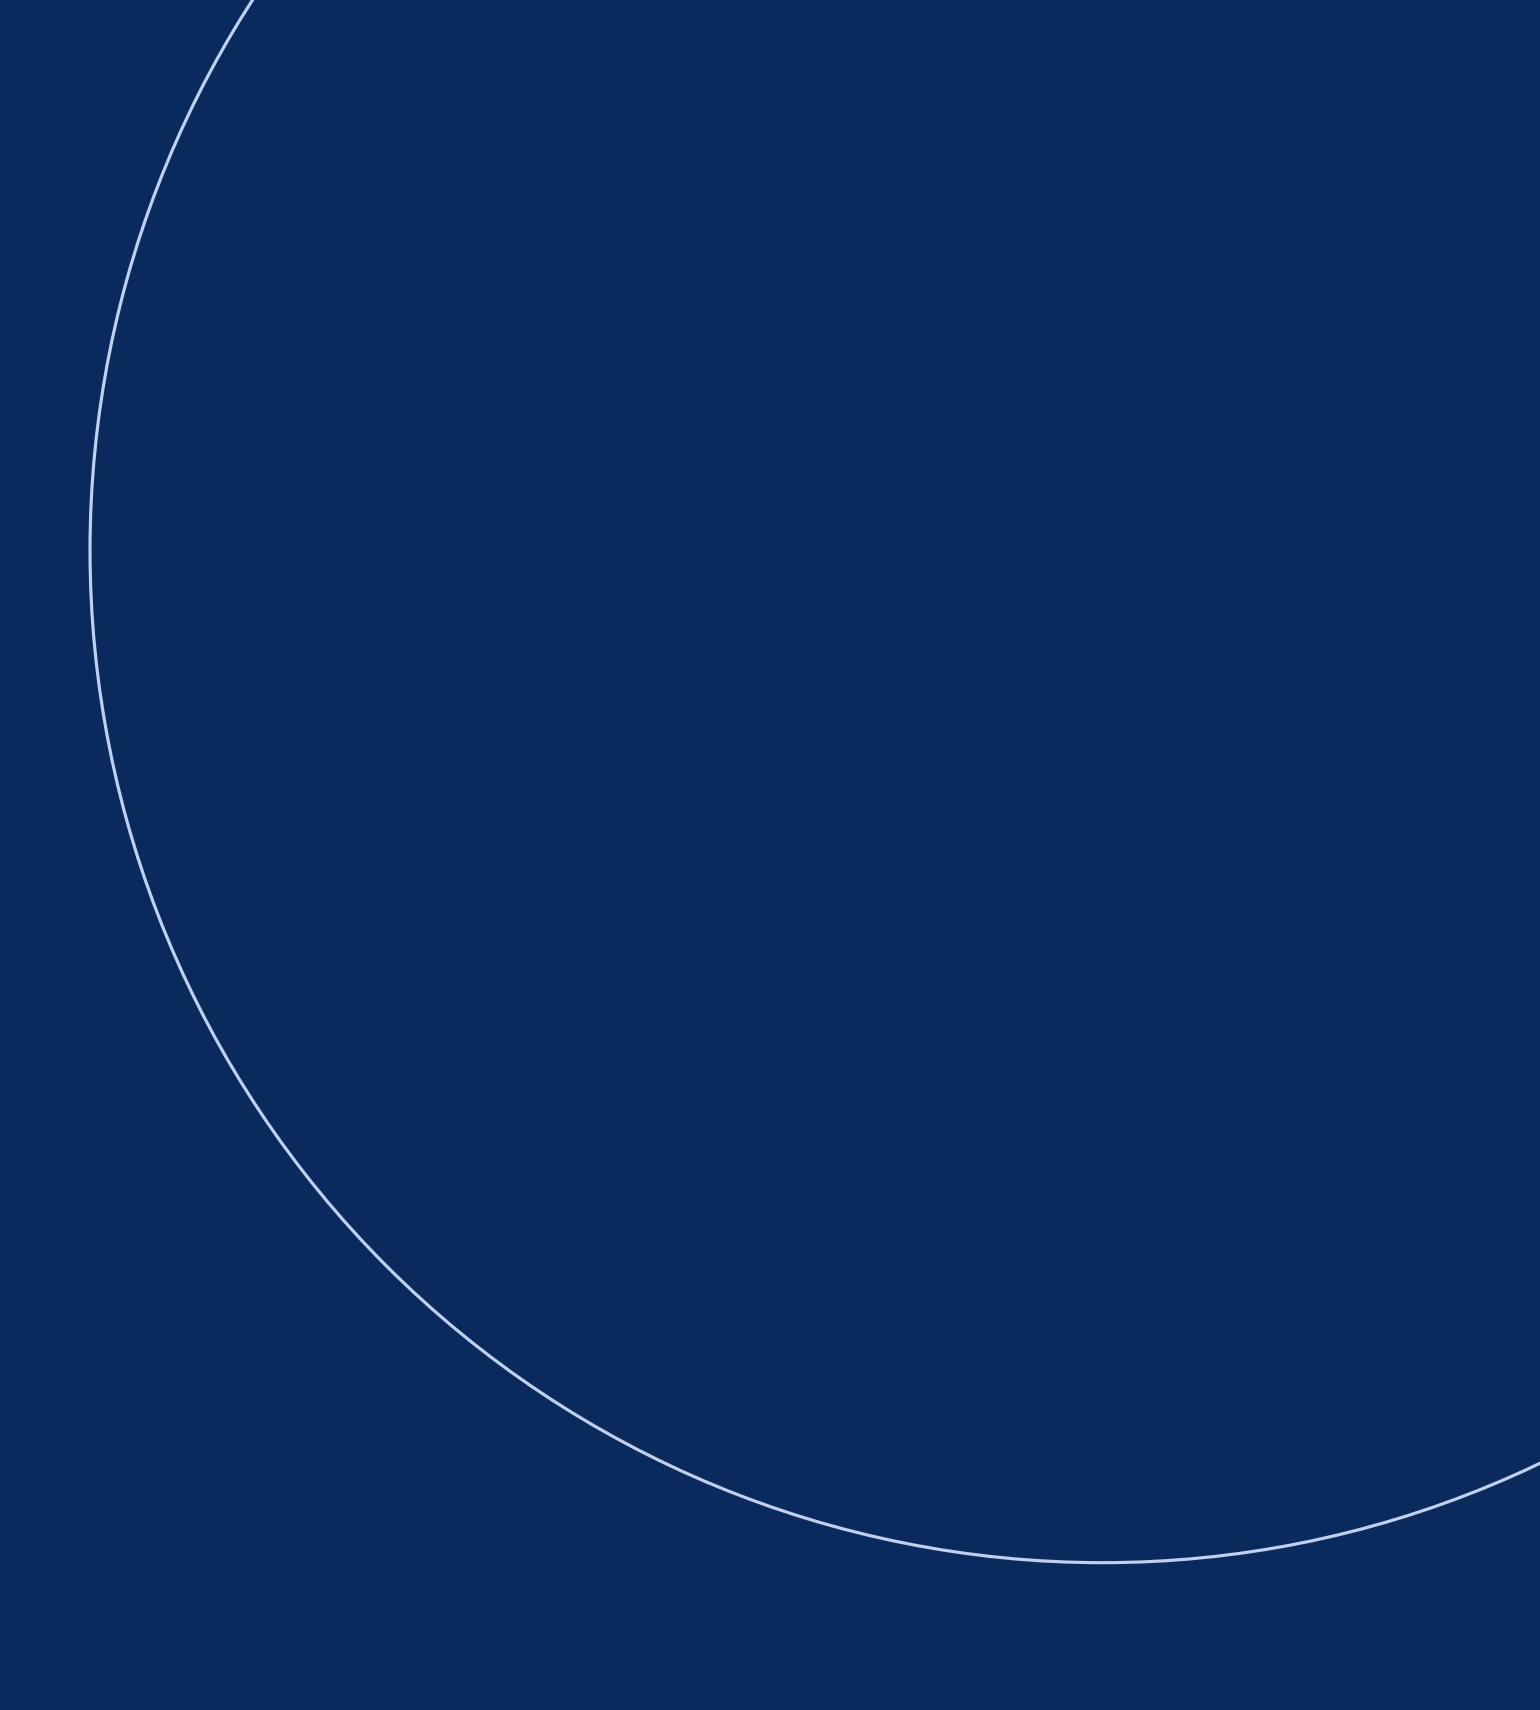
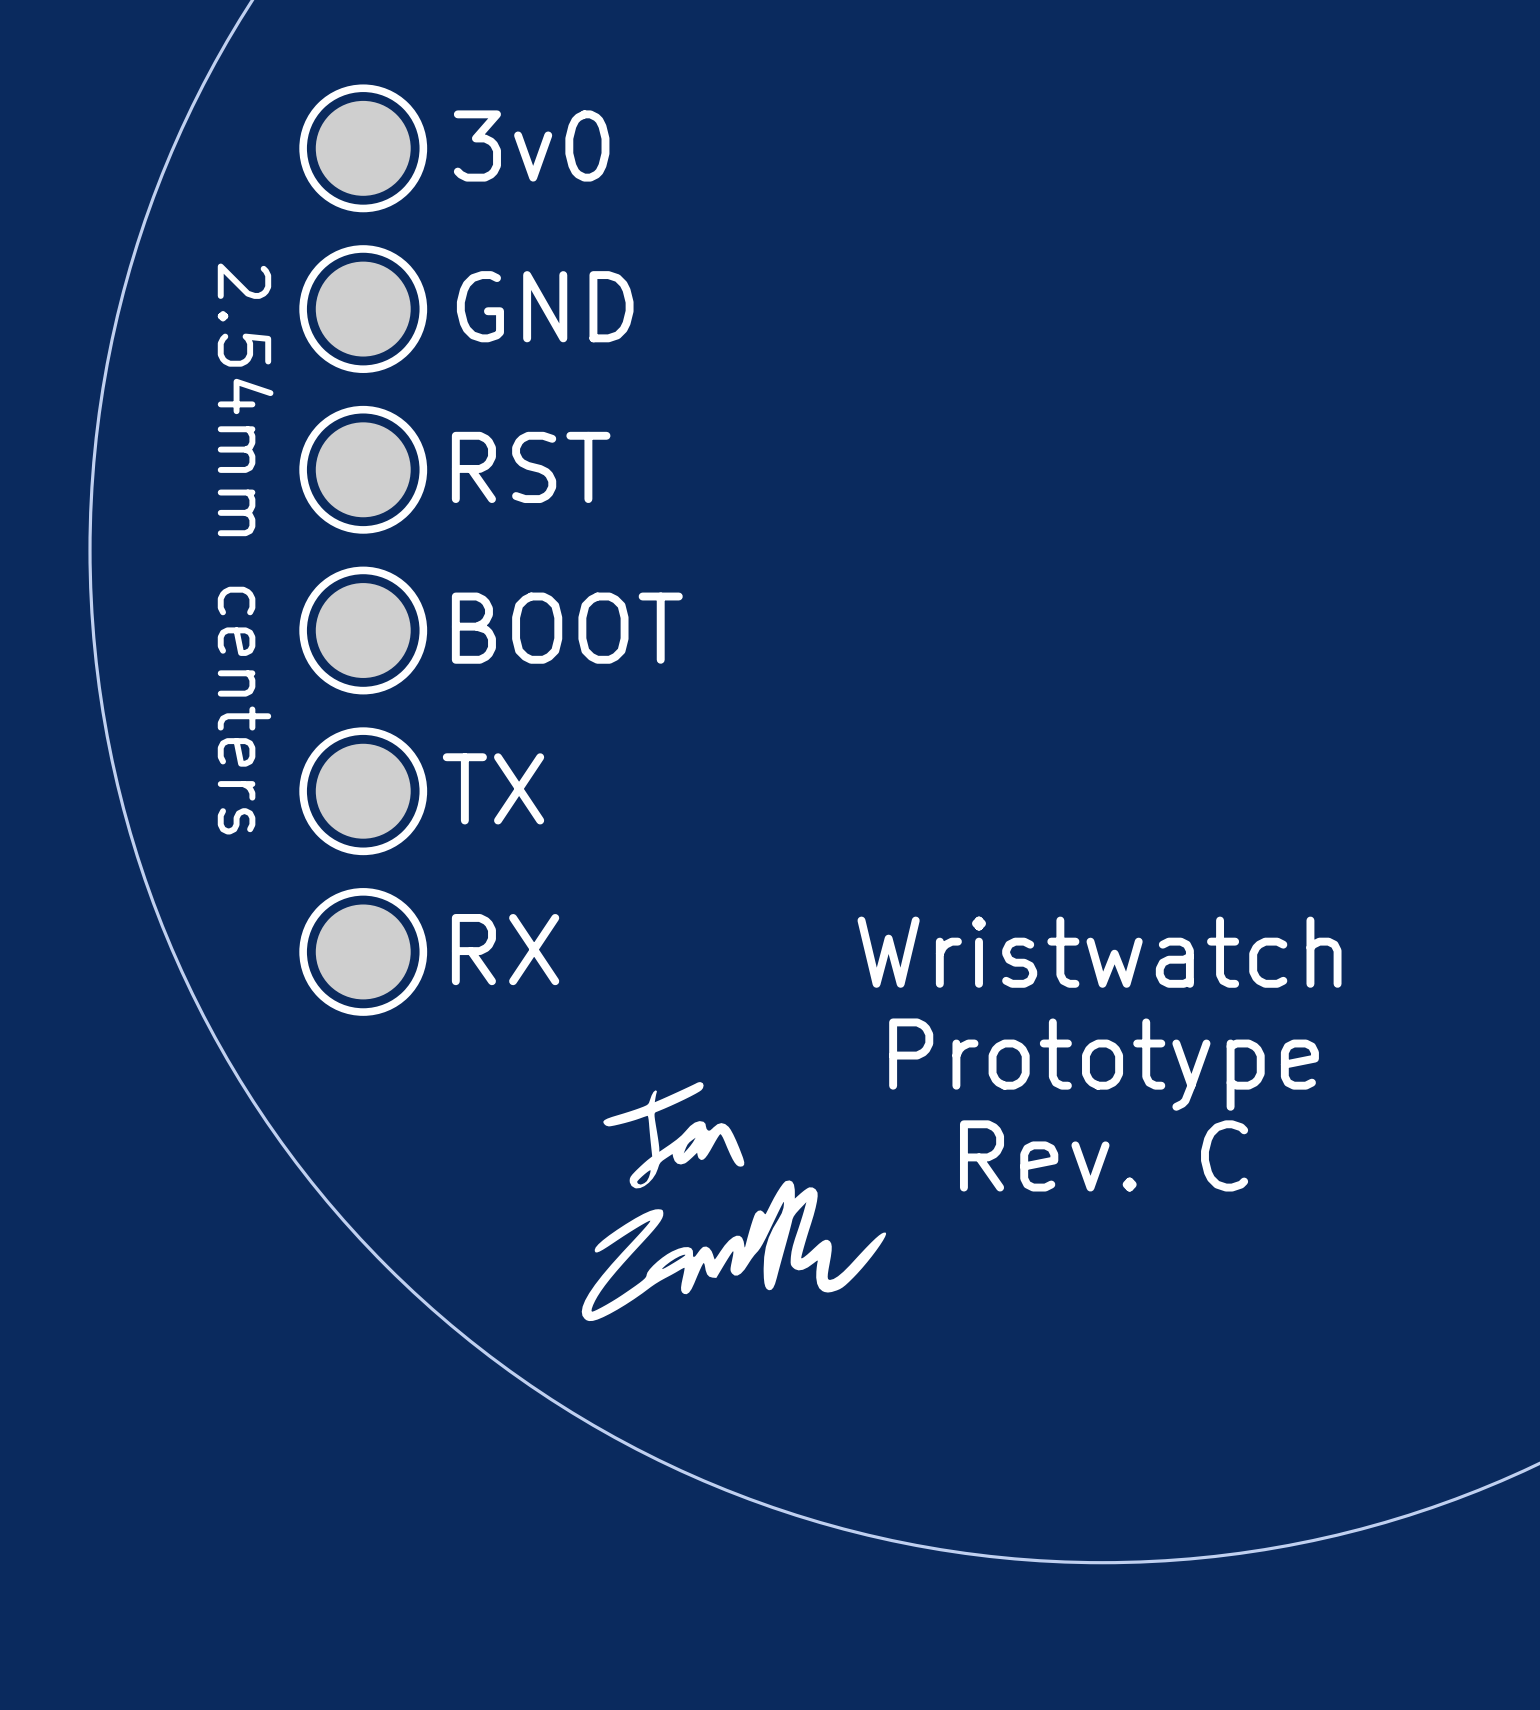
text: none -> 3v0 (531, 145)
part: none -> (363, 148)
text: none -> GND (545, 306)
part: none -> (363, 309)
text: none -> RST (531, 467)
part: none -> (363, 469)
text: none -> 2.54mm centers (245, 549)
text: none -> BOOT (567, 628)
part: none -> (363, 630)
text: none -> TX (493, 788)
part: none -> (363, 791)
text: none -> RX (505, 949)
part: none -> (363, 951)
text: none -> Wristwatch (1099, 952)
text: none -> Prototype (1104, 1064)
drawing: none -> [581, 1082, 887, 1322]
text: none -> Rev. C (1104, 1155)

